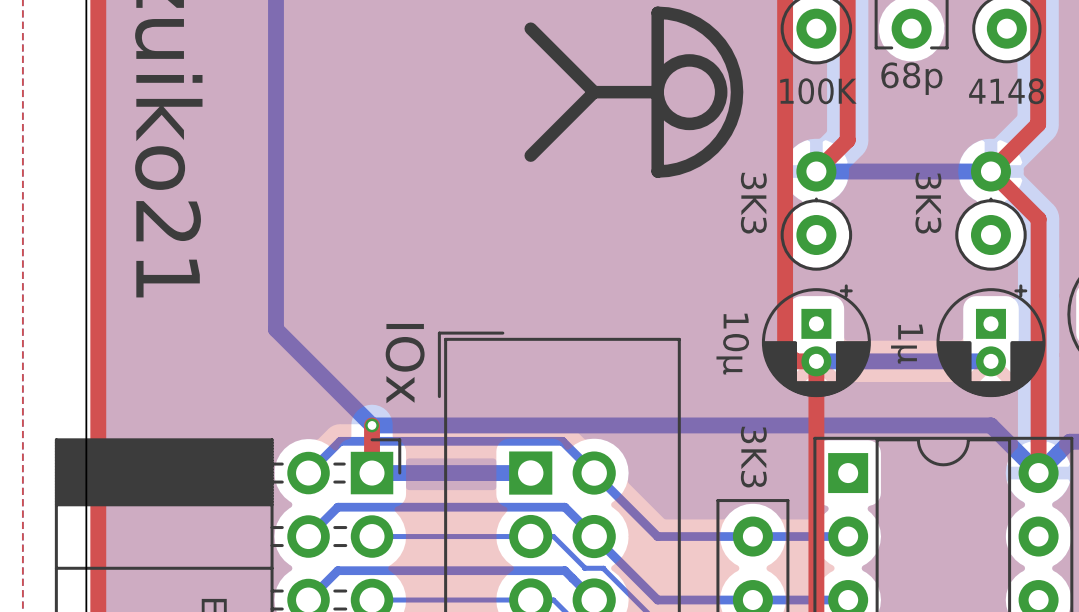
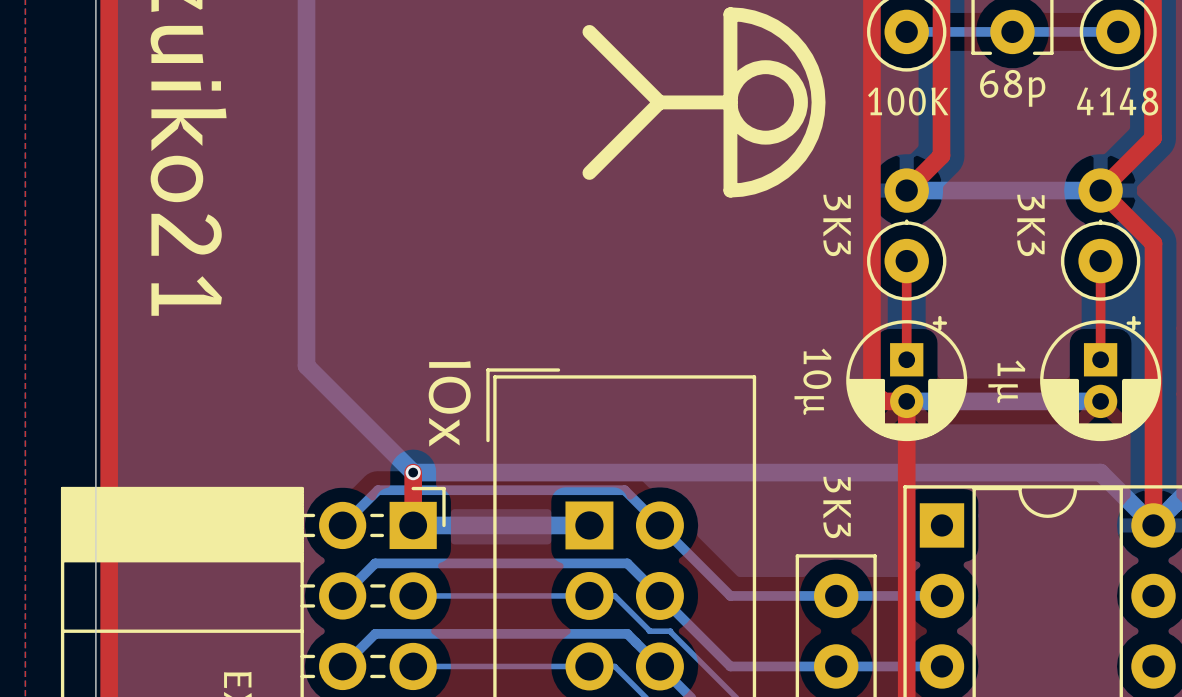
bottom track: none -> (906, 31) (1118, 31)
top track: none -> (906, 261) (906, 359)
top track: none -> (1100, 261) (1100, 359)

